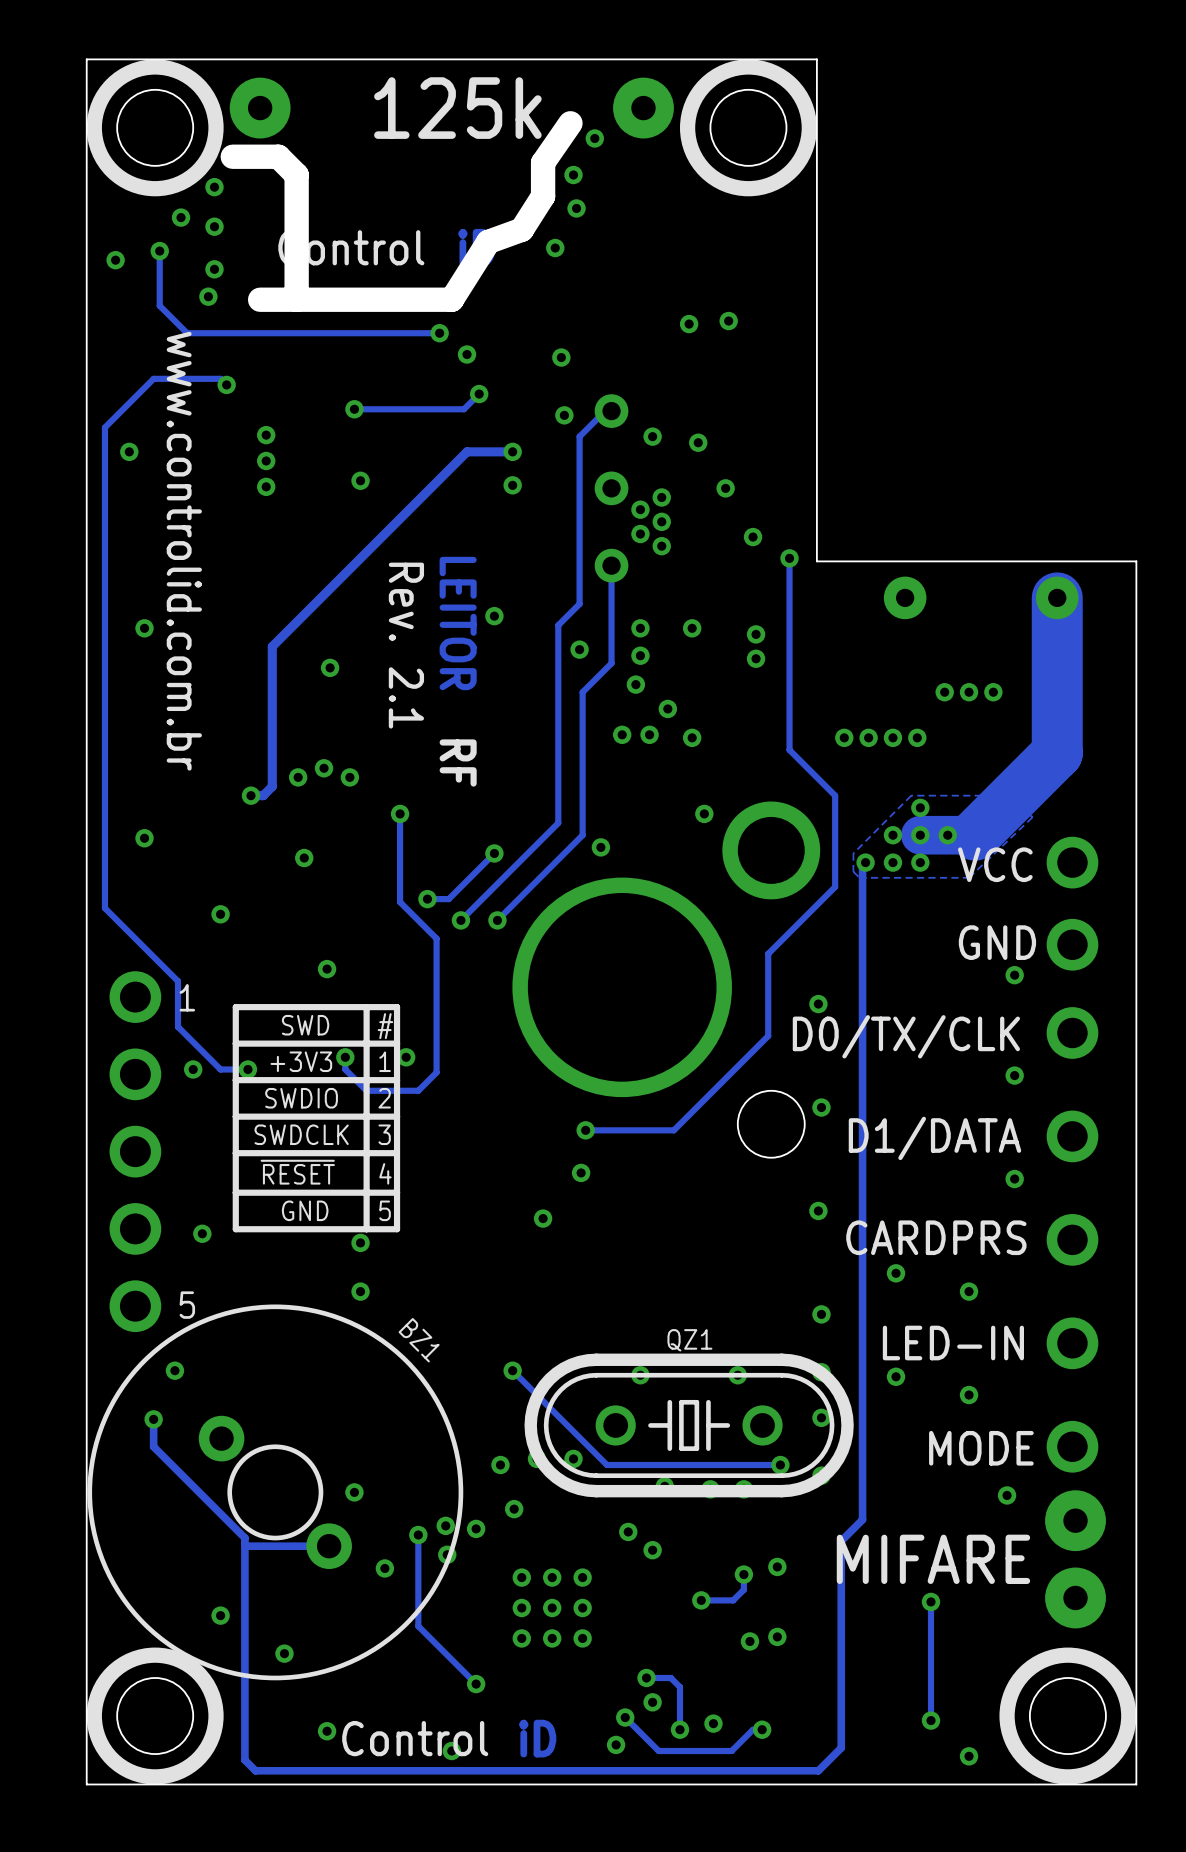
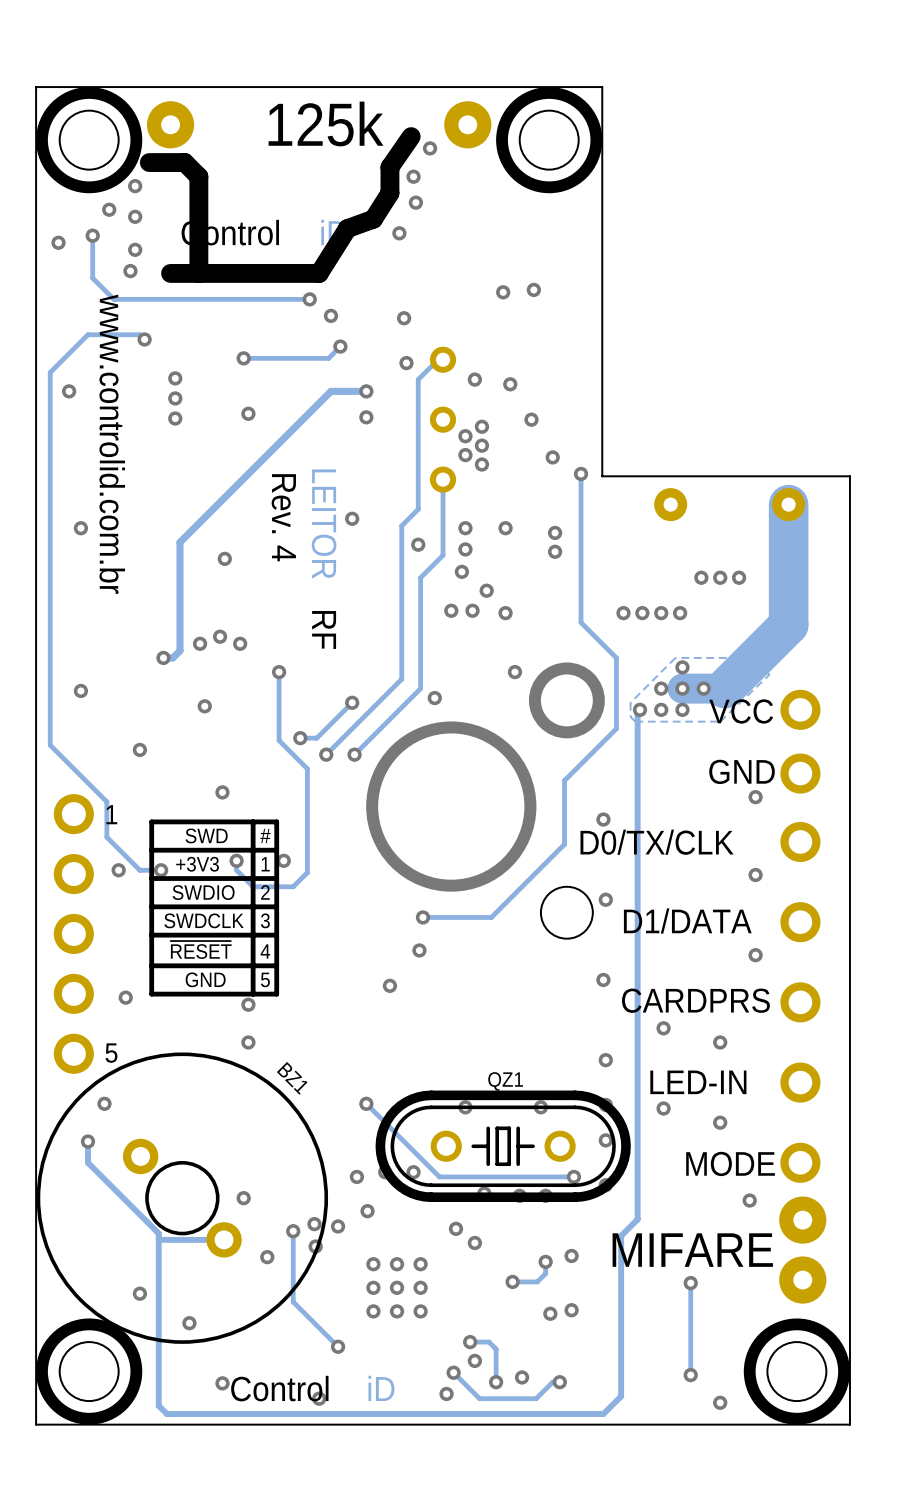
text: Rev. 2.1 (406, 645) -> Rev. 4 (283, 517)

